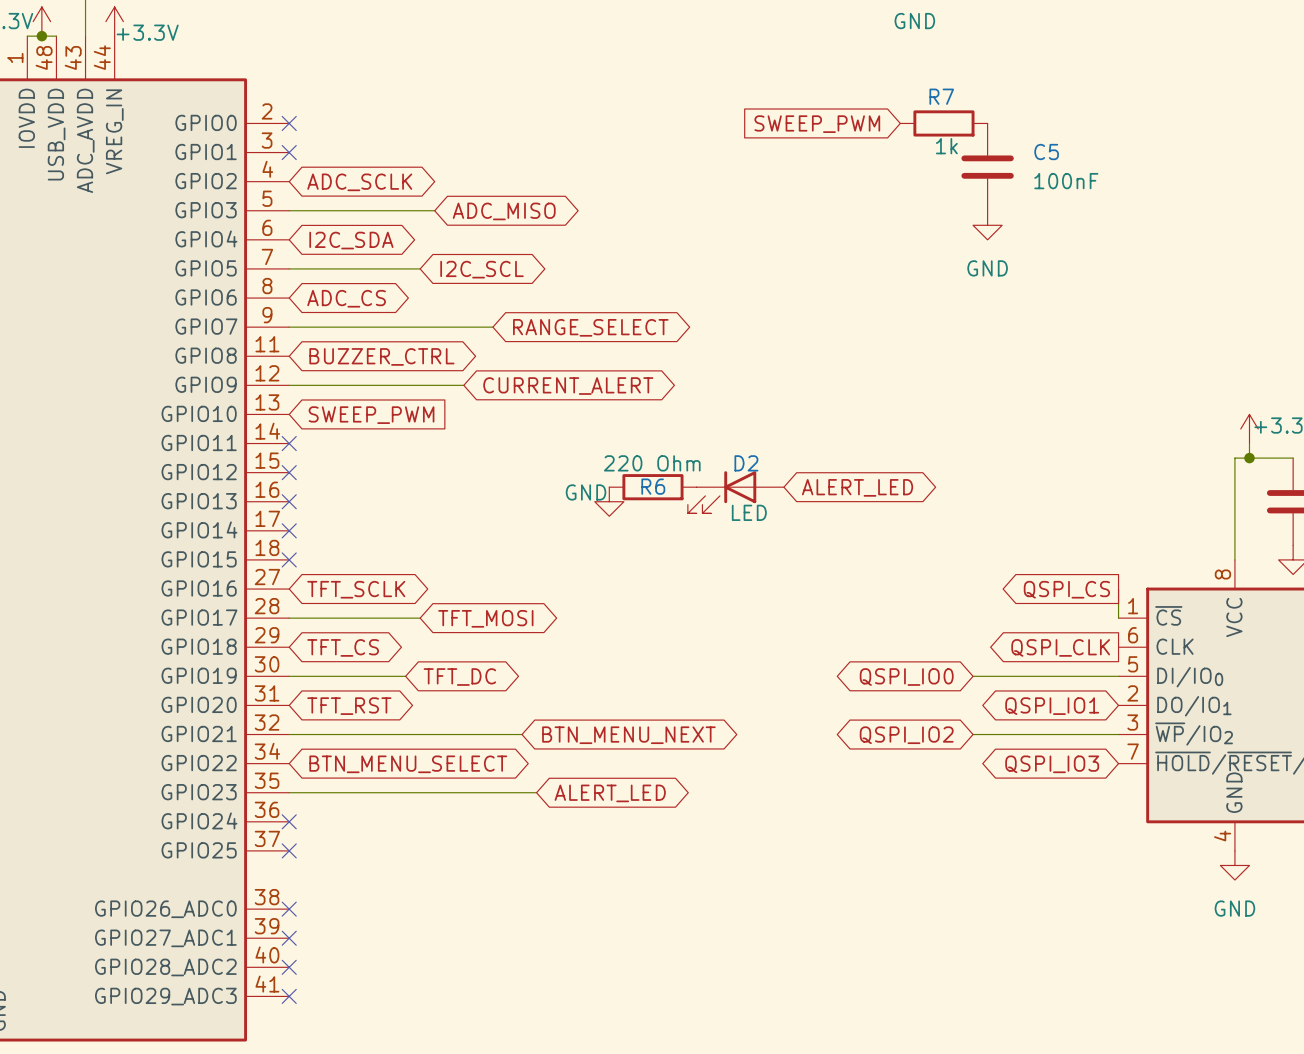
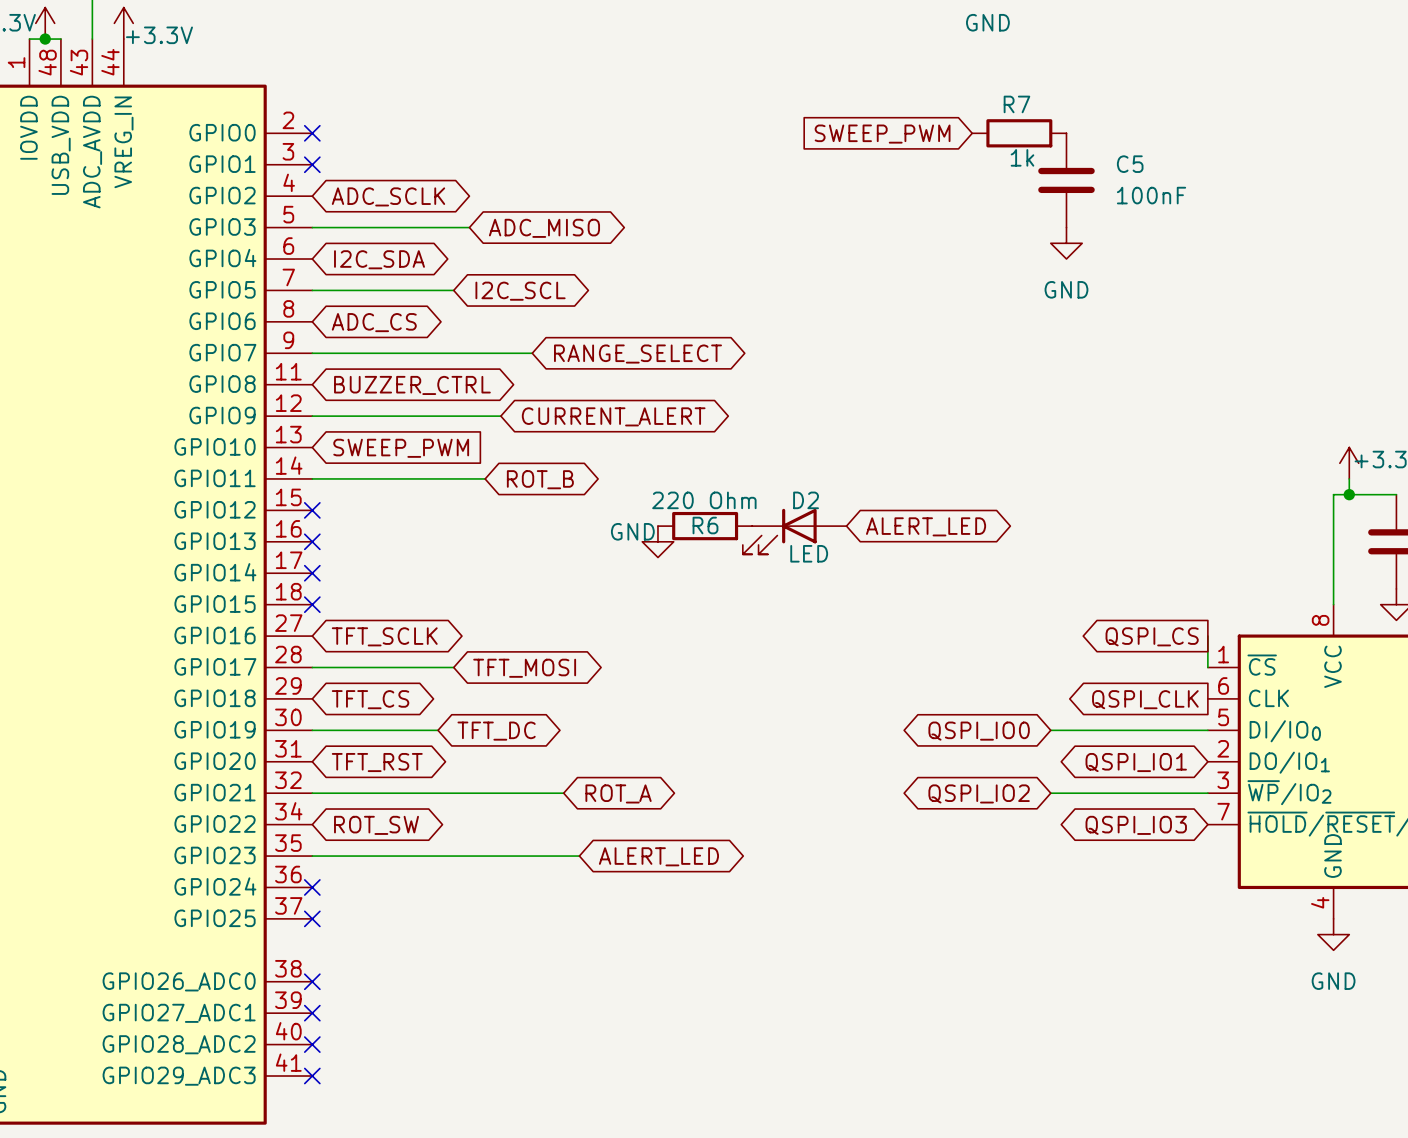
wire: none -> (312, 478) (485, 478)
no-connect mark: (289, 443) -> none
global label: none -> ROT_B (540, 479)
global label: BTN_MENU_NEXT (628, 735) -> ROT_A (618, 793)
global label: BTN_MENU_SELECT (408, 764) -> ROT_SW (376, 825)

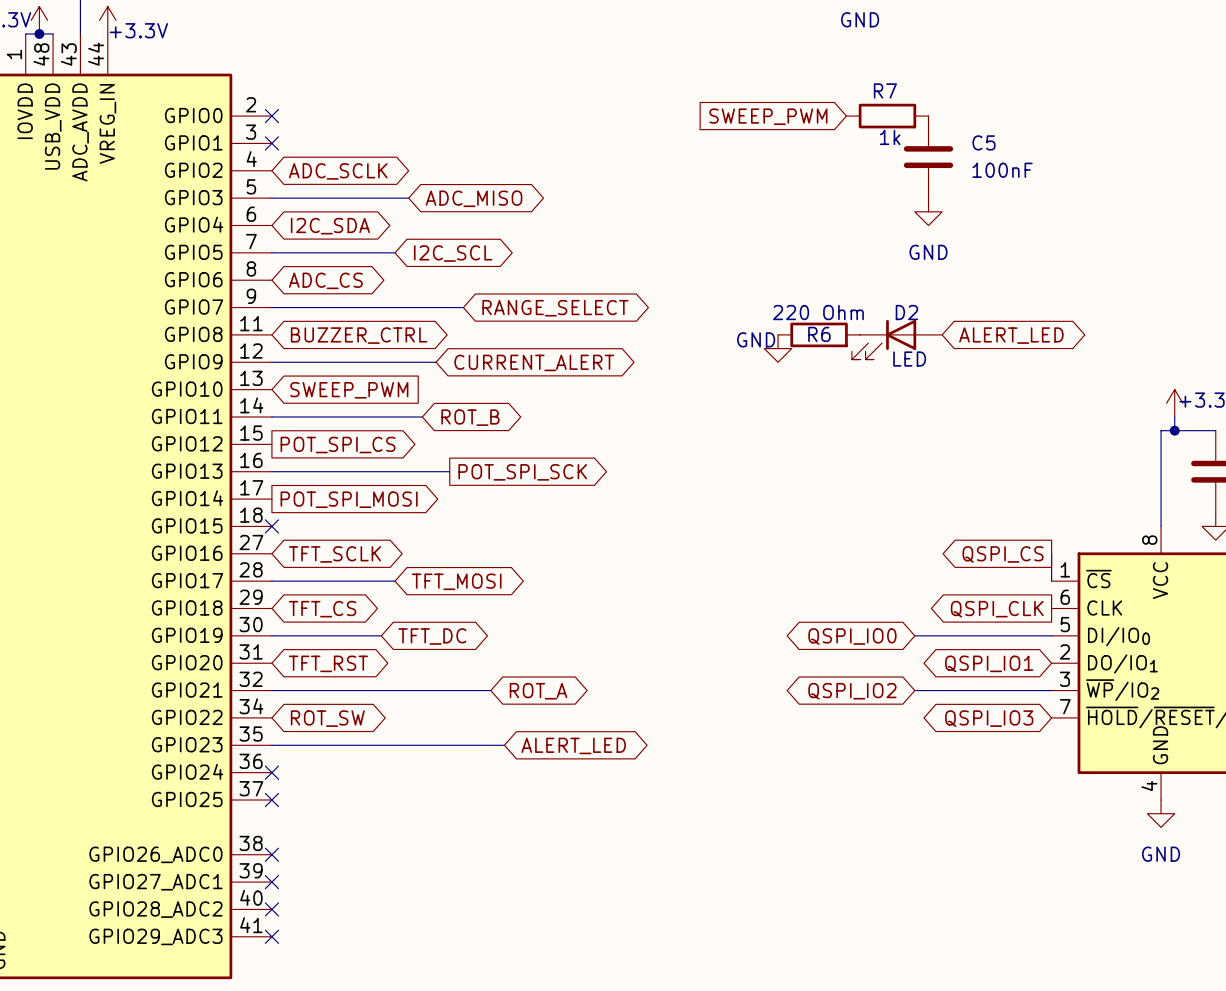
no-connect mark: (312, 510) -> none
global label: none -> POT_SPI_CS (338, 445)
R6 position: (705, 526) -> (819, 334)
global label position: ALERT_LED (926, 526) -> ALERT_LED (1011, 335)
D2 position: (794, 531) -> (897, 339)
wire: none -> (271, 471) (449, 471)
no-connect mark: (312, 541) -> none
power symbol position: GND (657, 541) -> GND (778, 348)
global label: none -> POT_SPI_SCK (522, 472)
no-connect mark: (312, 573) -> none
global label: none -> POT_SPI_MOSI (349, 499)

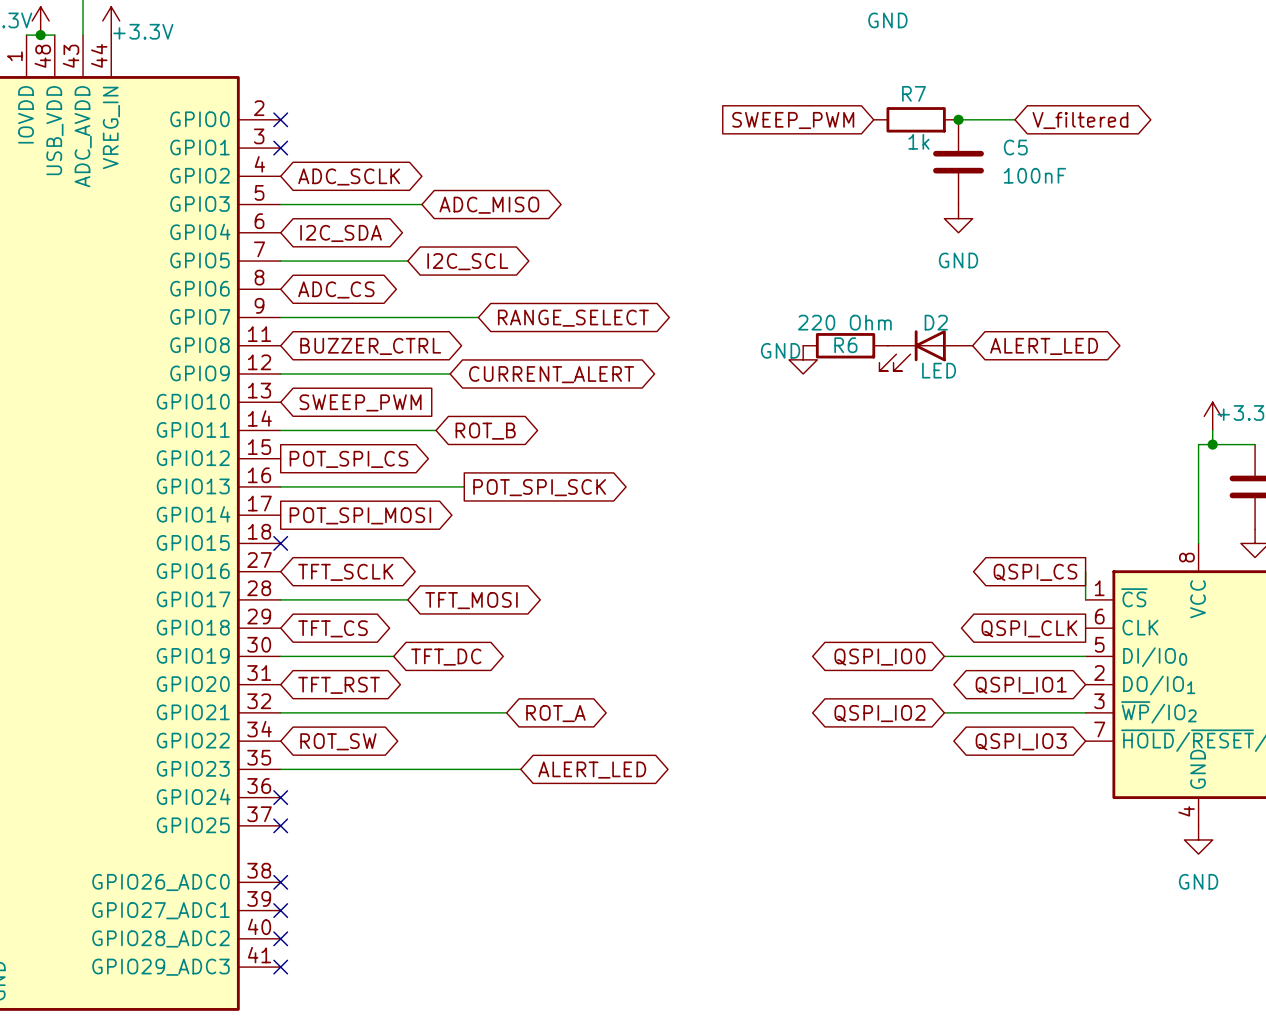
wire: none -> (958, 119) (1014, 119)
junction: none -> (958, 119)
global label: none -> V_filtered (1080, 120)

